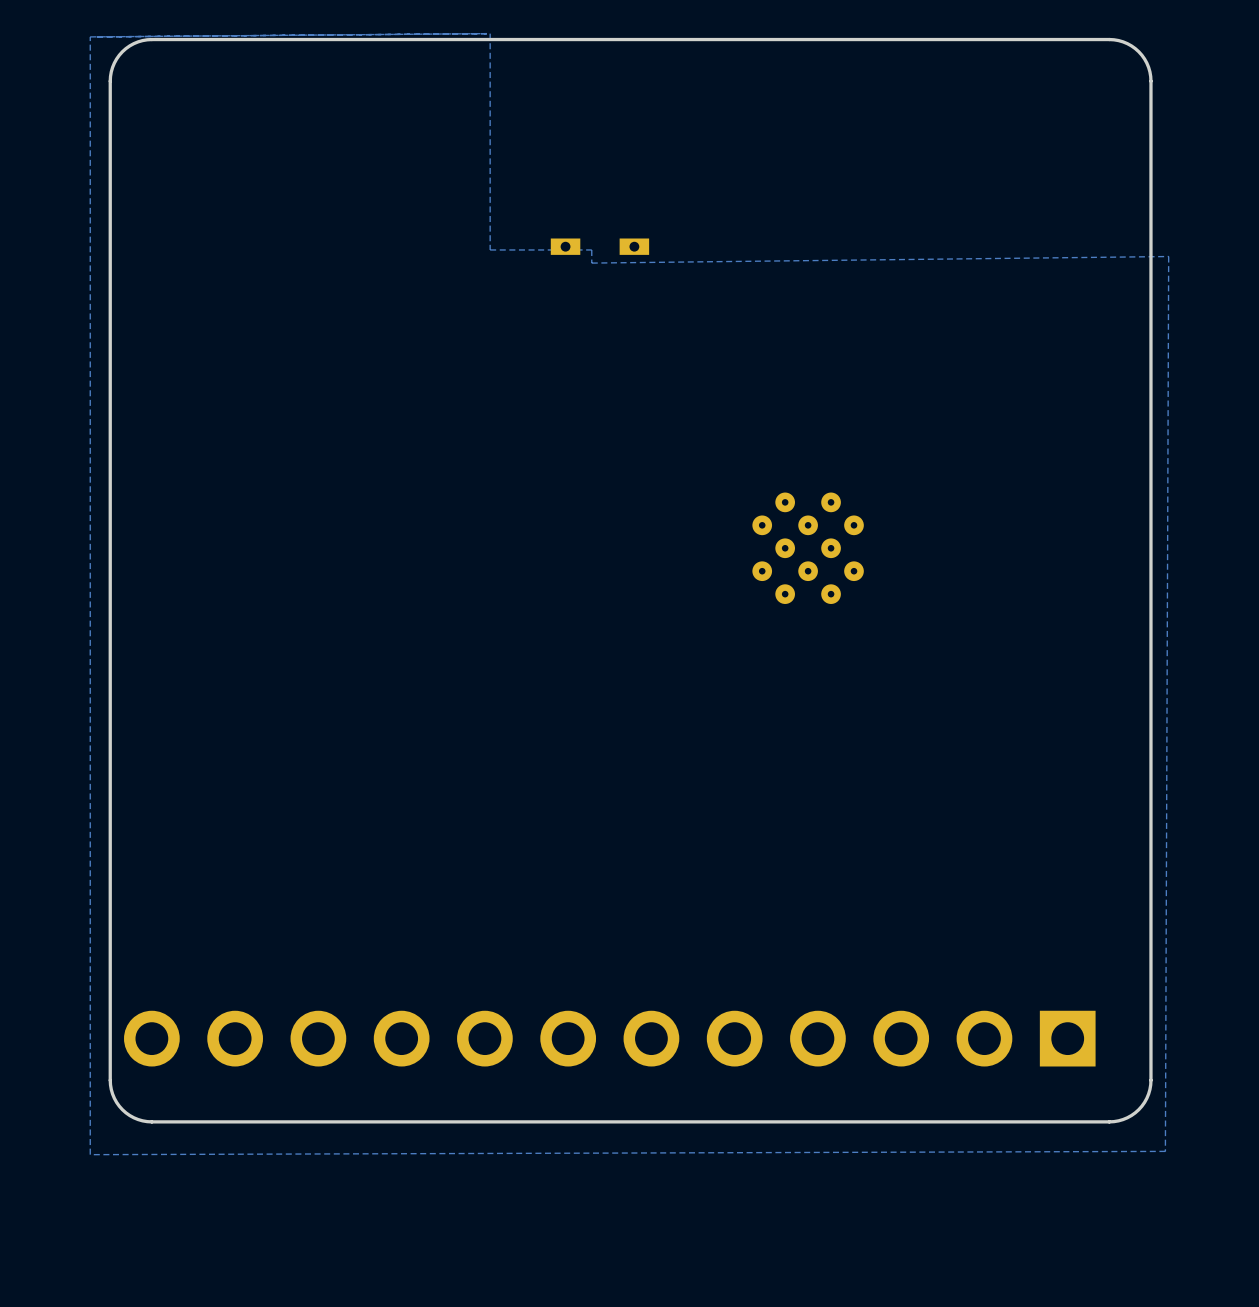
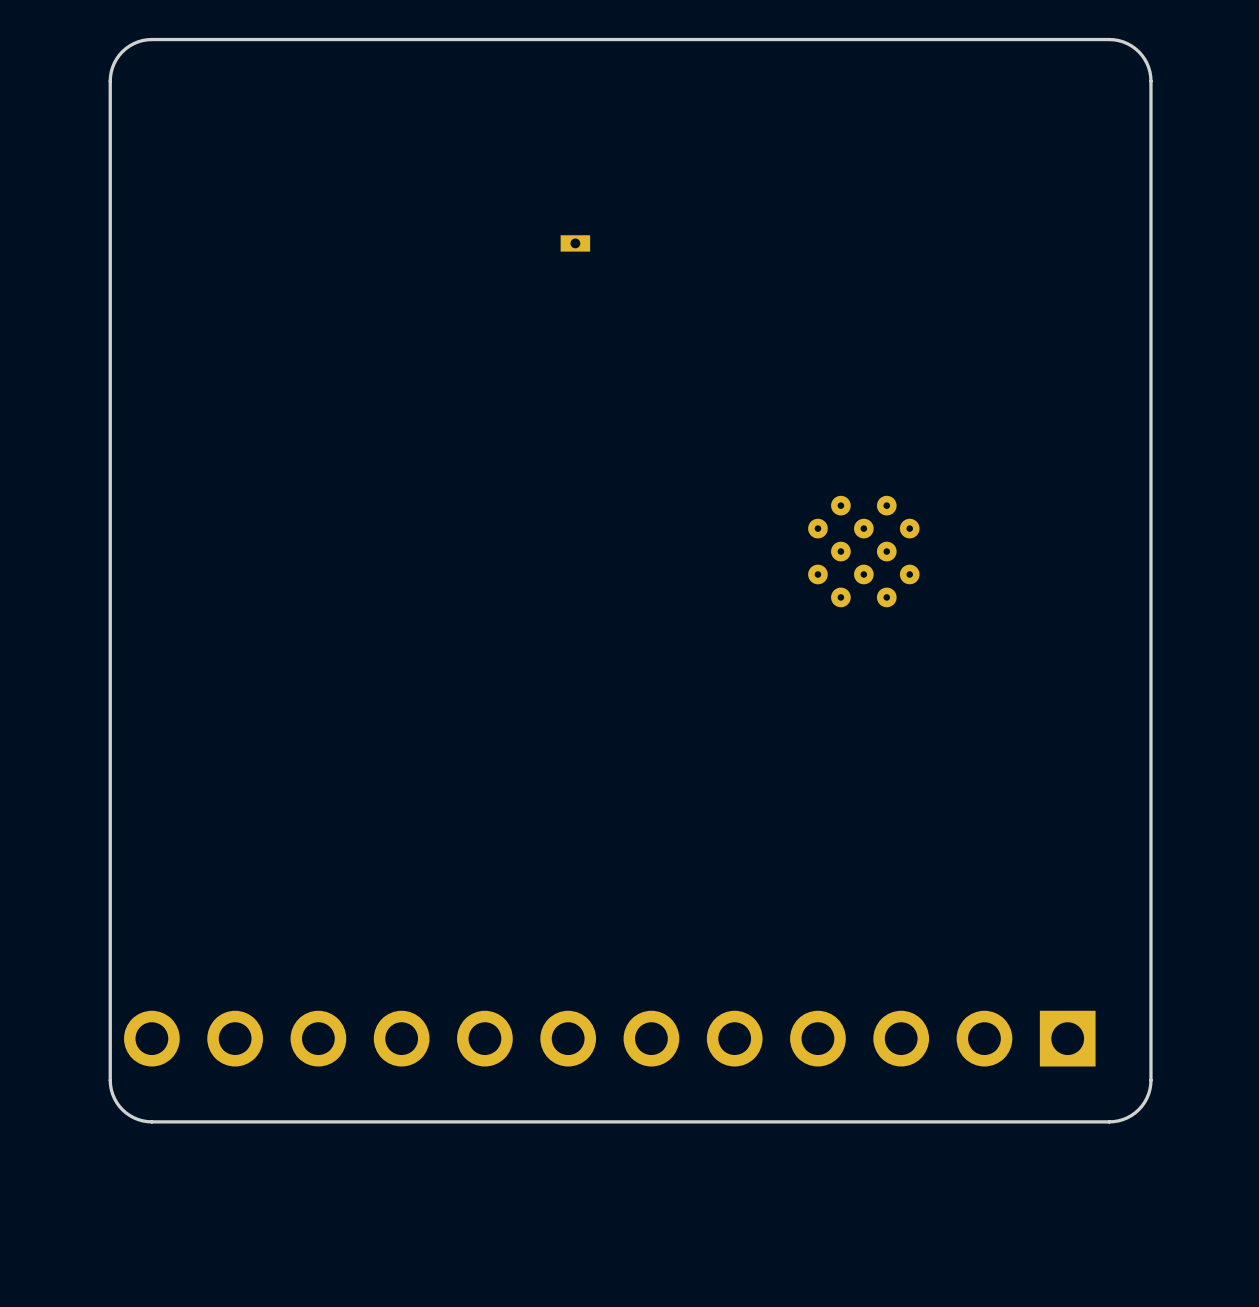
zone outline: (490, 33) (90, 36) (90, 1154) (1165, 1151) (1168, 256) (591, 263) (591, 249) (490, 249) (490, 33) -> none
part footprint: [550, 238, 650, 255] -> [560, 235, 591, 252]
part position: (808, 548) -> (863, 551)

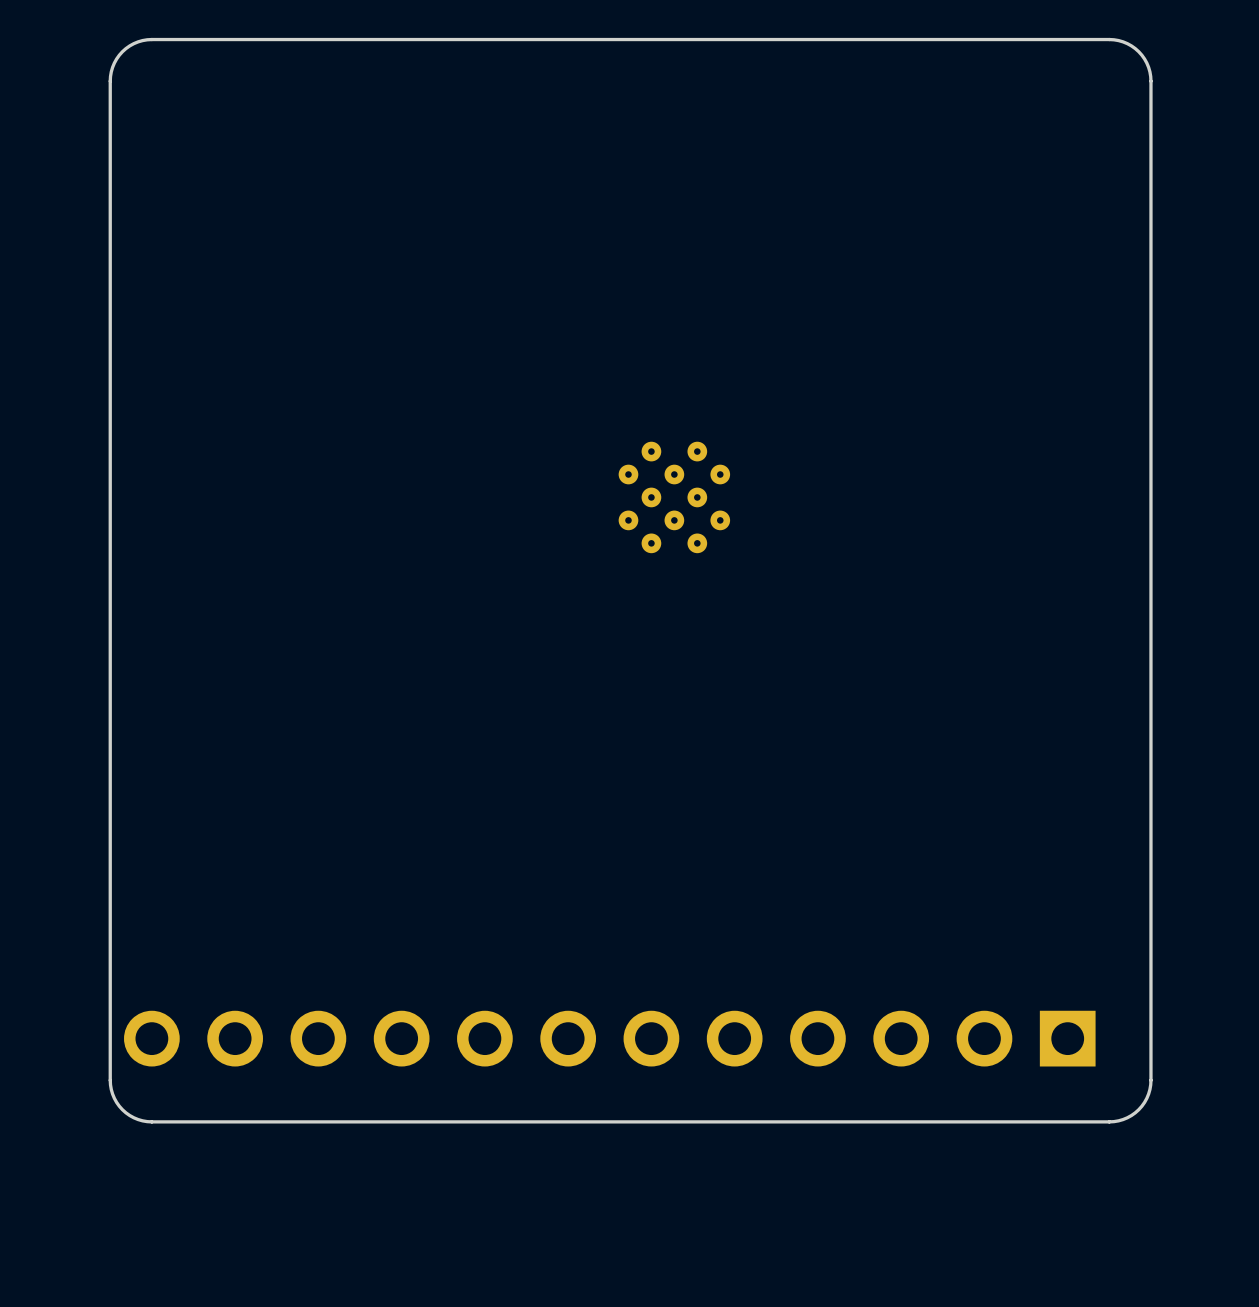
part: (575, 243) -> none
part position: (863, 551) -> (674, 497)

